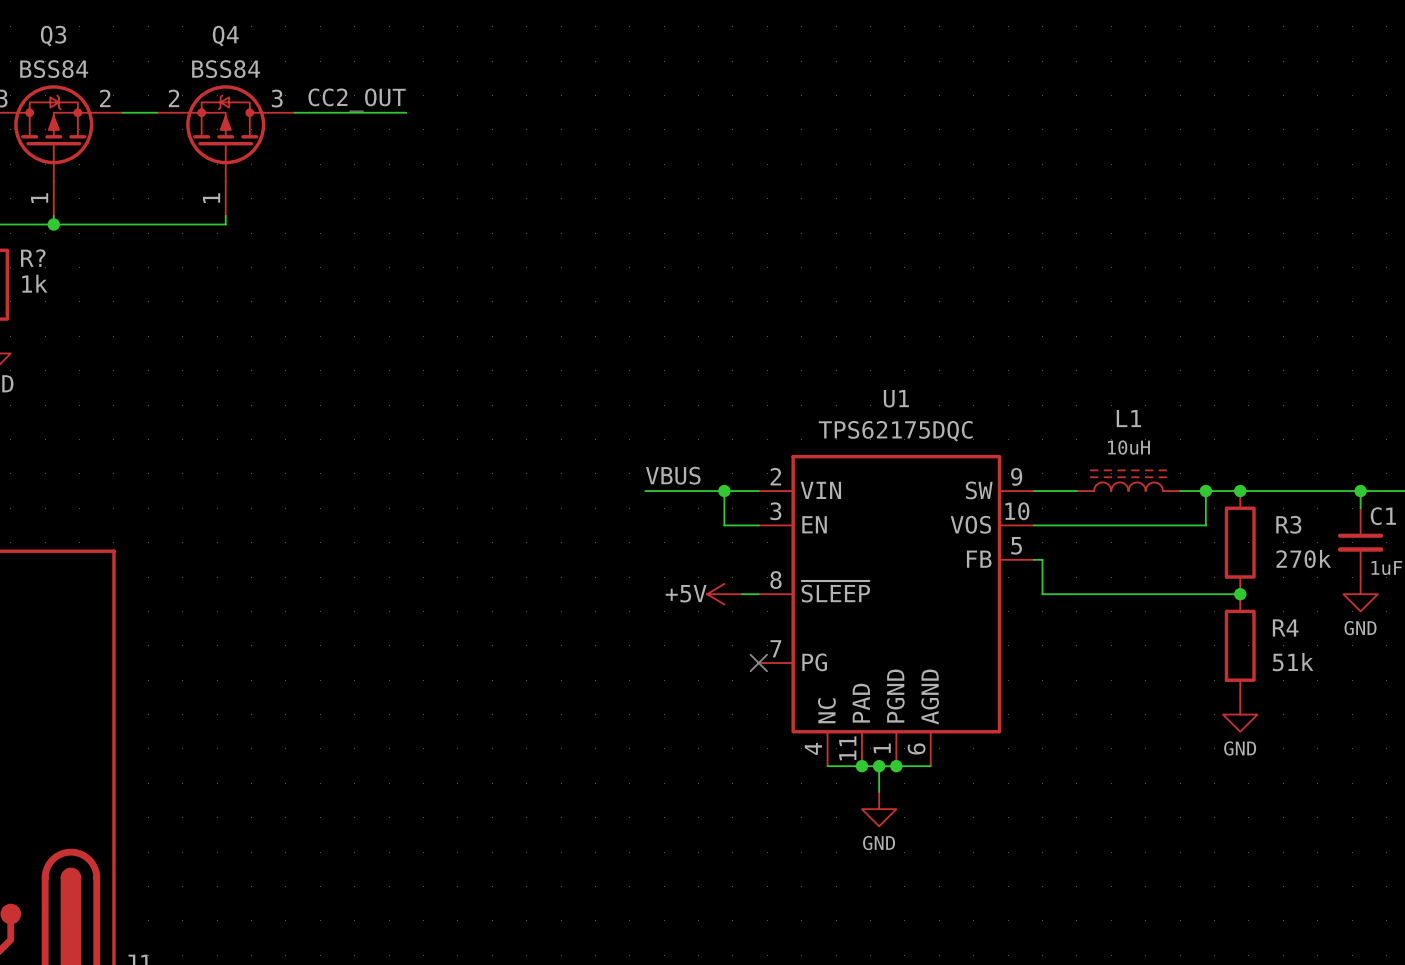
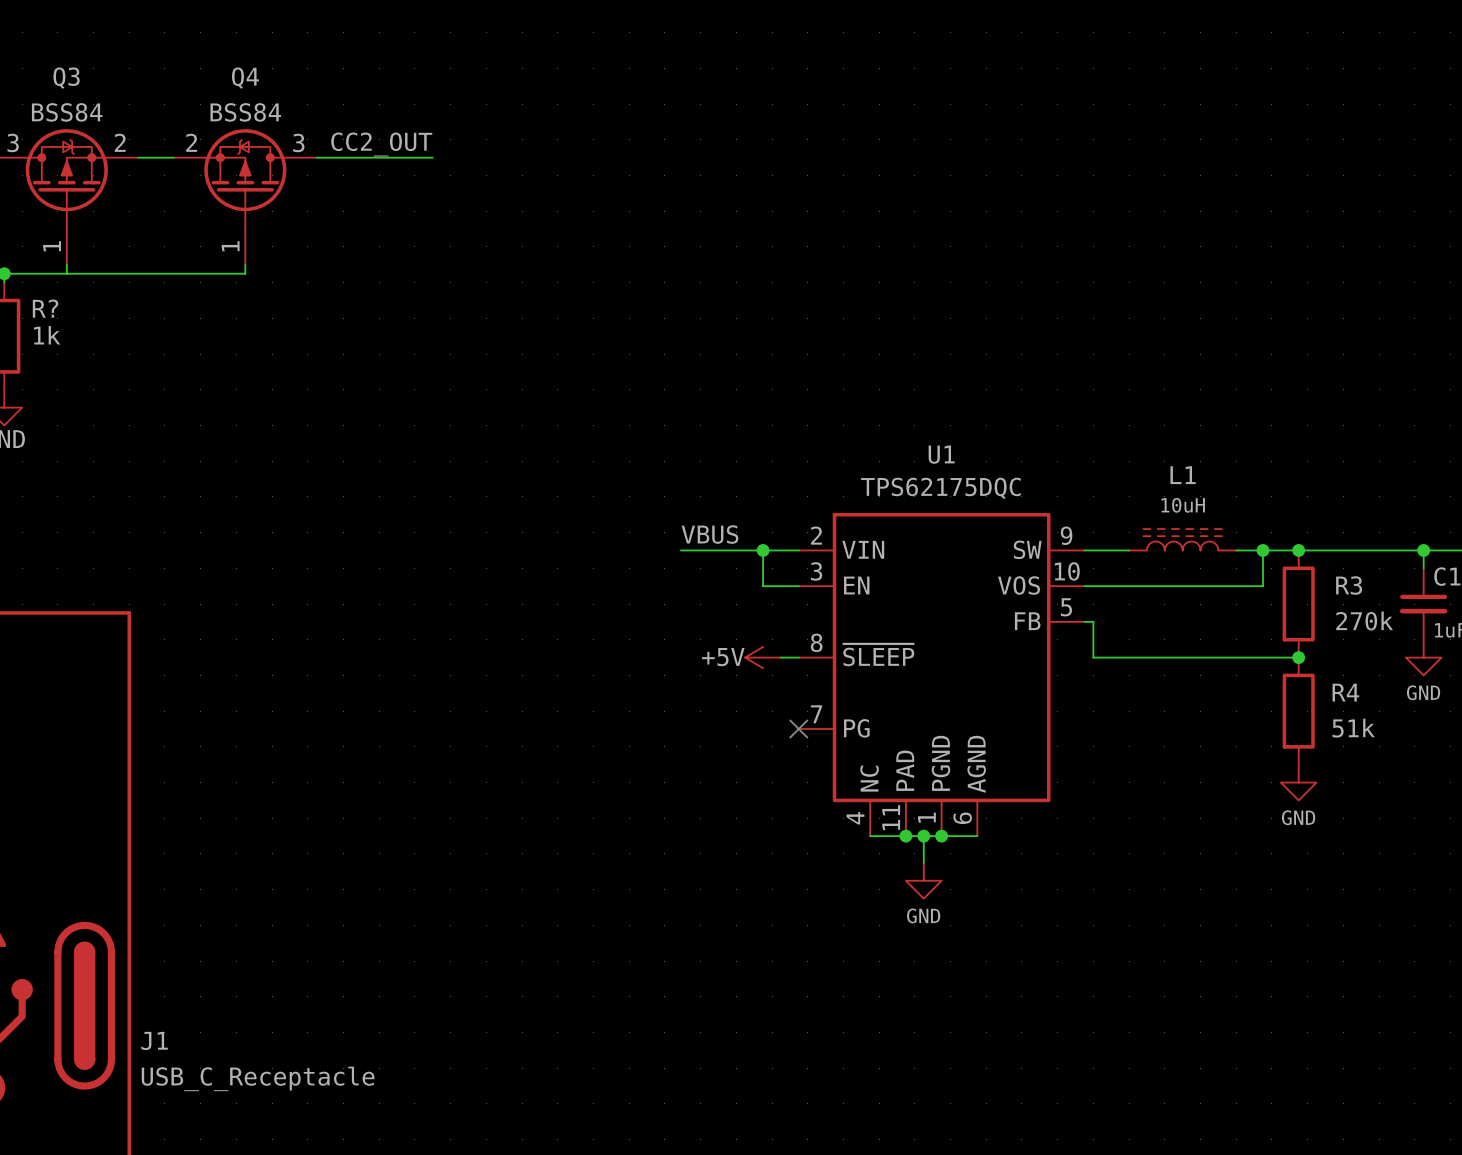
junction: (53, 224) -> none

